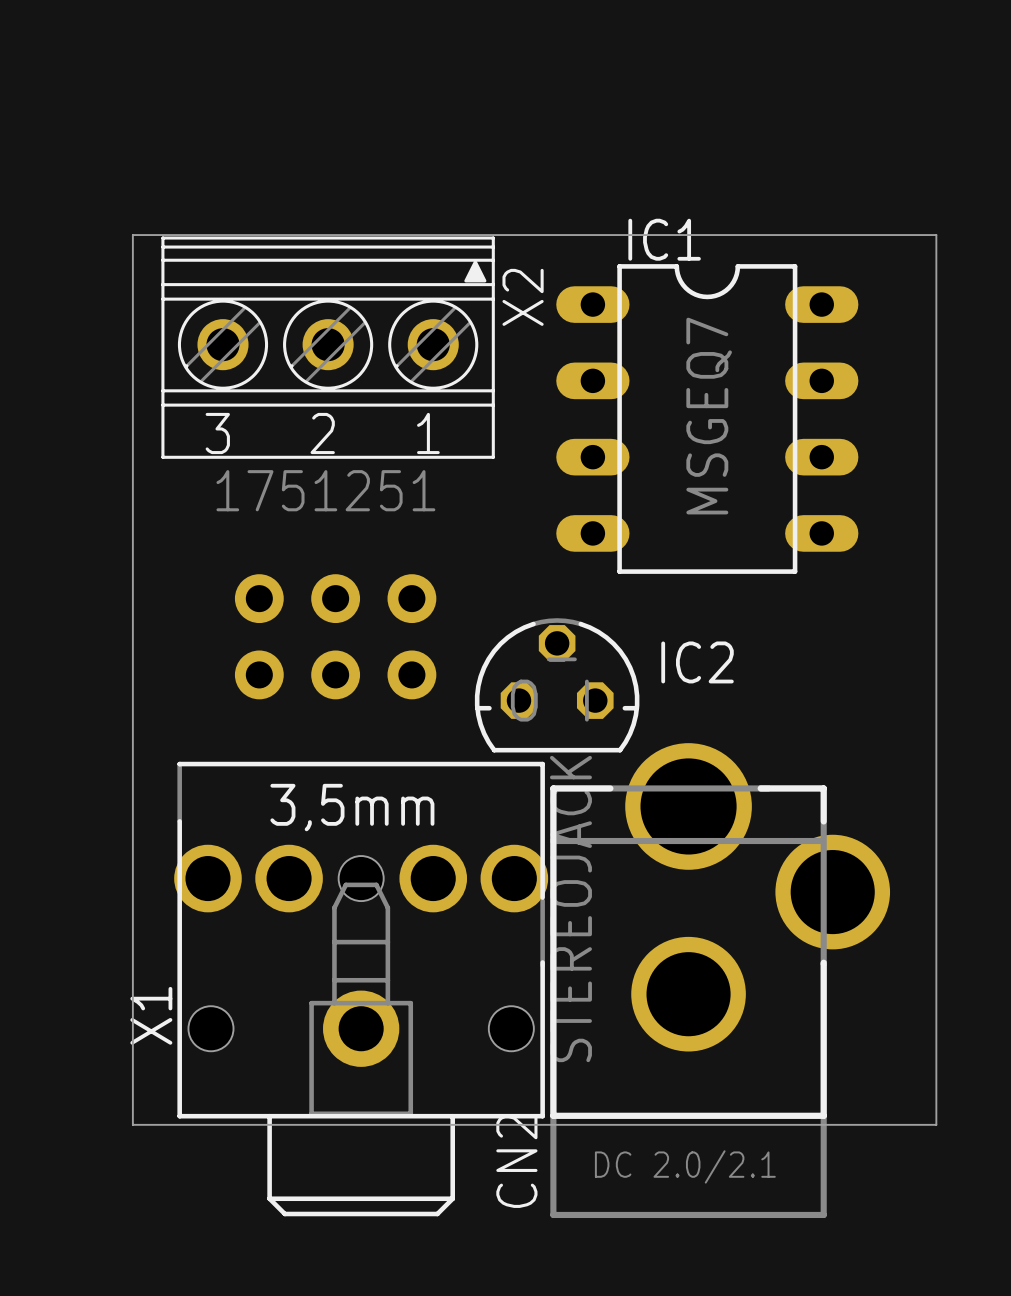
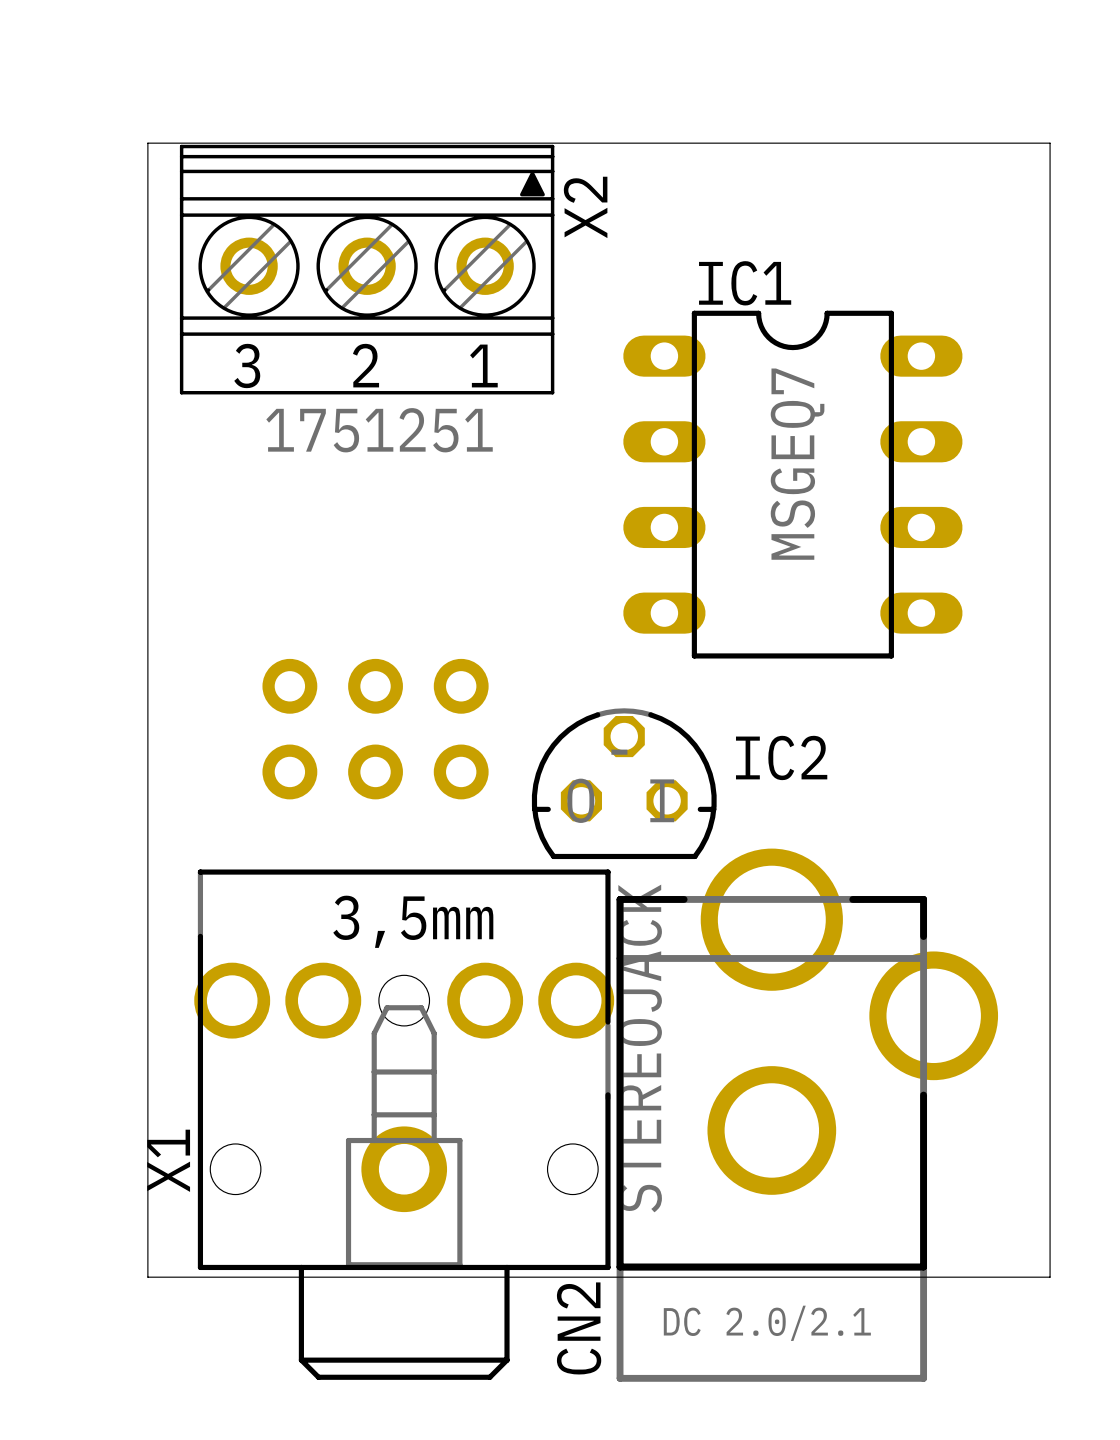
board edge: (132, 235) (936, 235) -> (147, 278) (147, 143) (1050, 143) (1050, 278)
X2 position: (328, 347) -> (367, 269)

